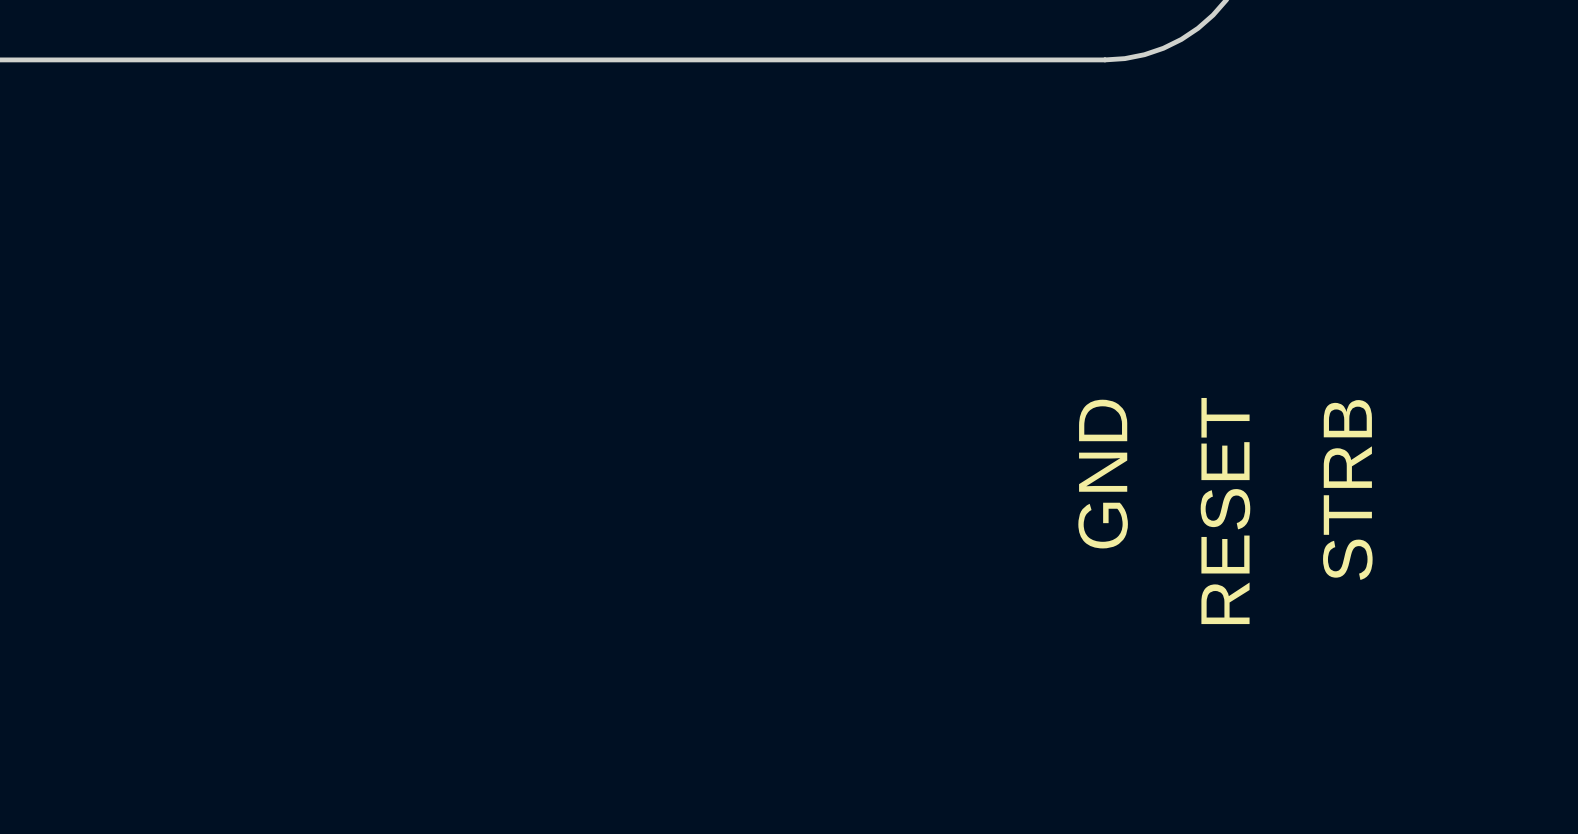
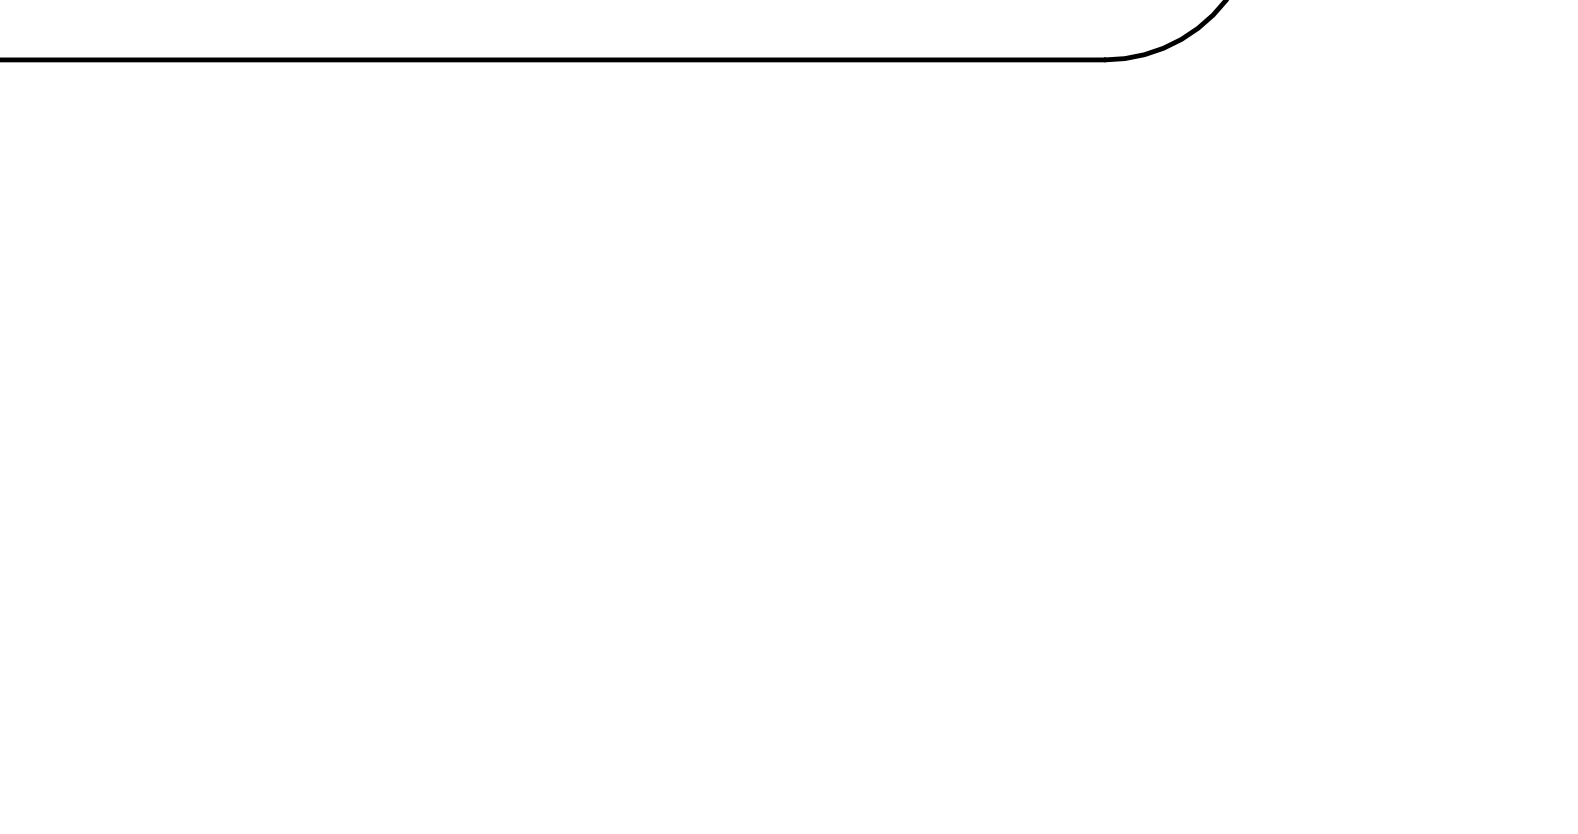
text: GND (1103, 474) -> none
text: STRB (1347, 489) -> none
text: RESET (1225, 511) -> none

